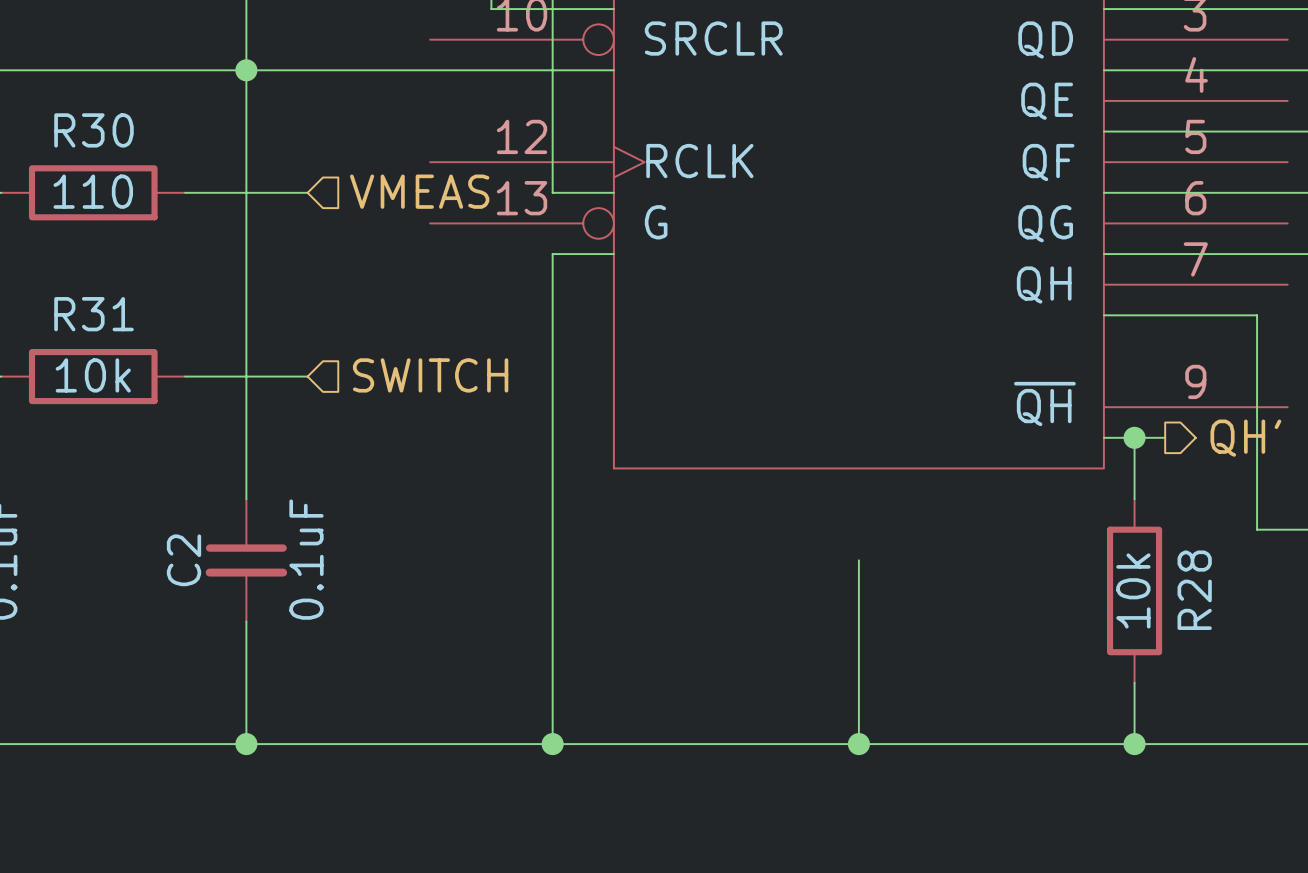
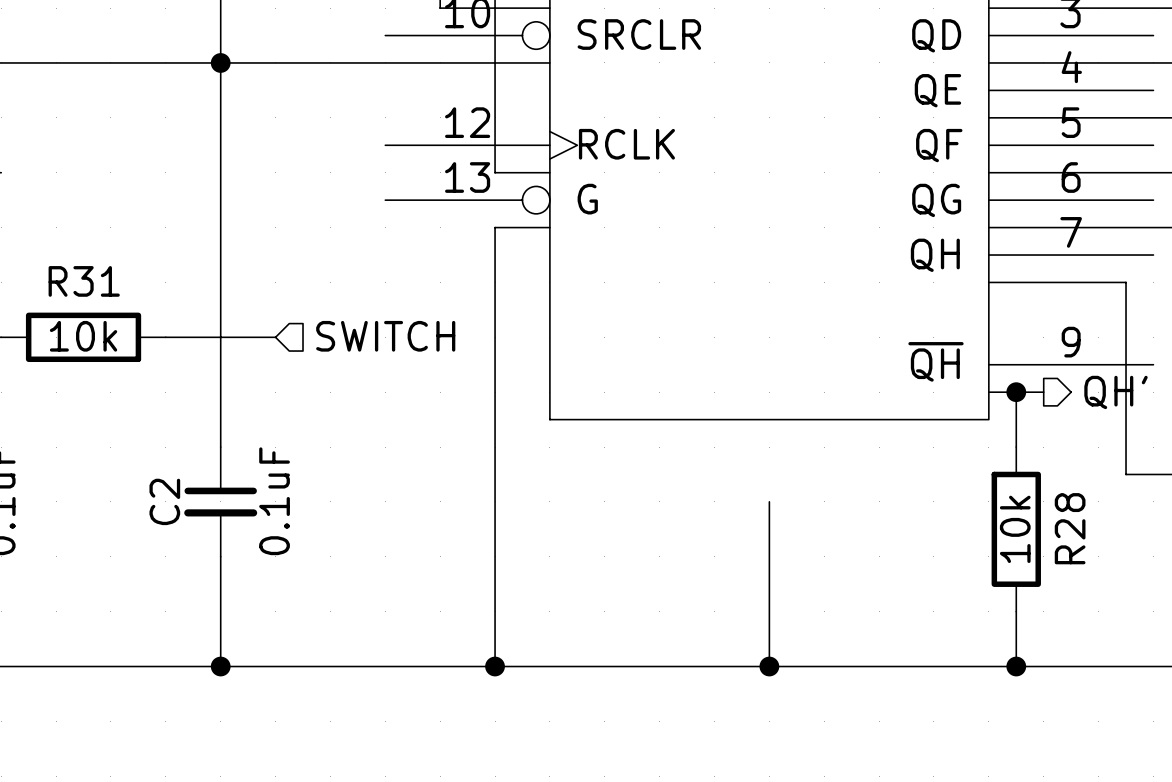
hierarchical label: VMEAS (419, 191) -> none
R30: 110 (93, 192) -> none
wire: (185, 192) (307, 192) -> none

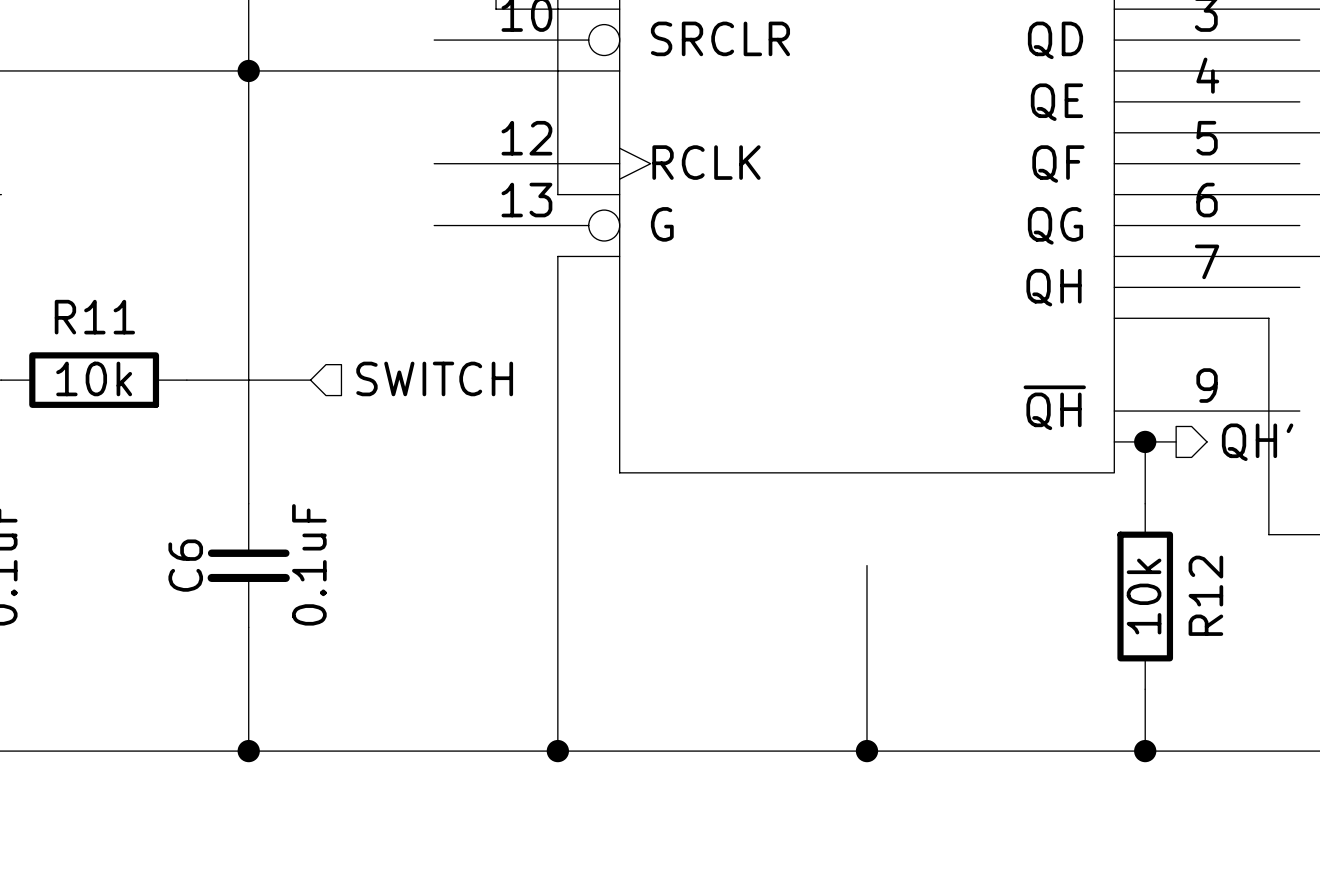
R31 name: R31 (84, 281) -> R11 (94, 317)
C2 name: C2 (164, 501) -> C6 (185, 565)
R28 name: R28 (1070, 528) -> R12 (1205, 595)

